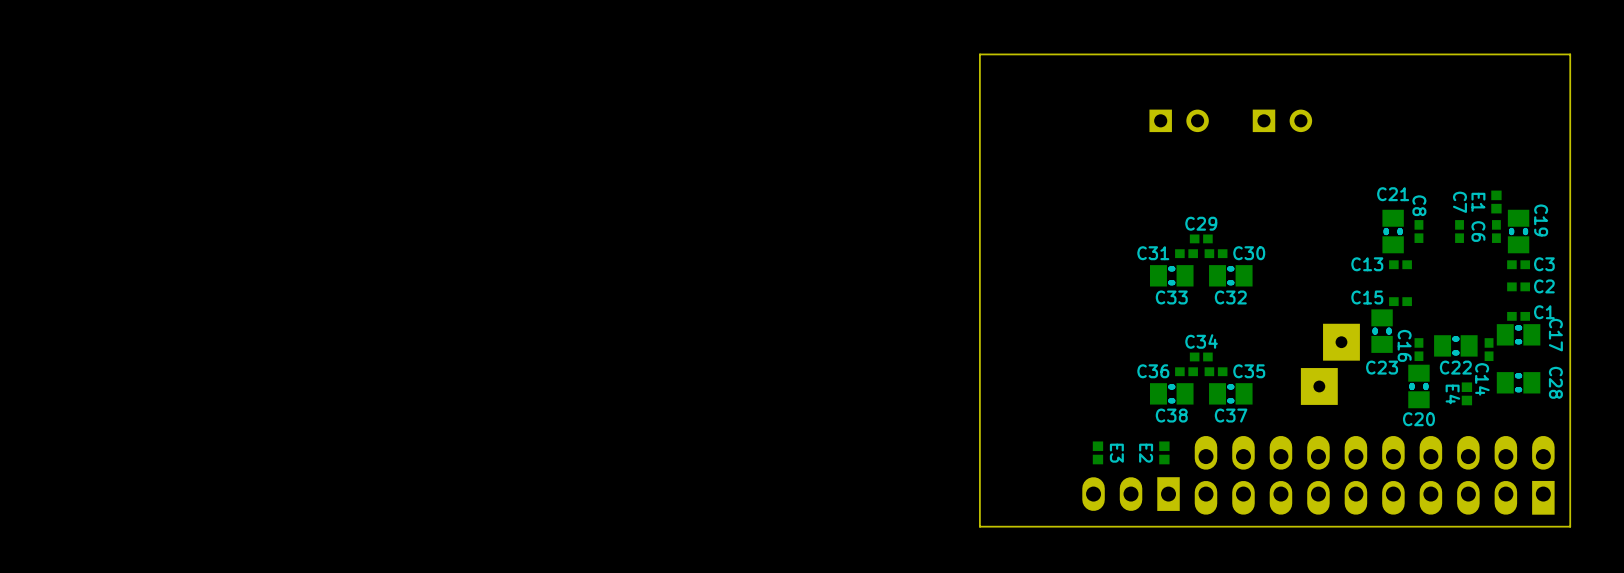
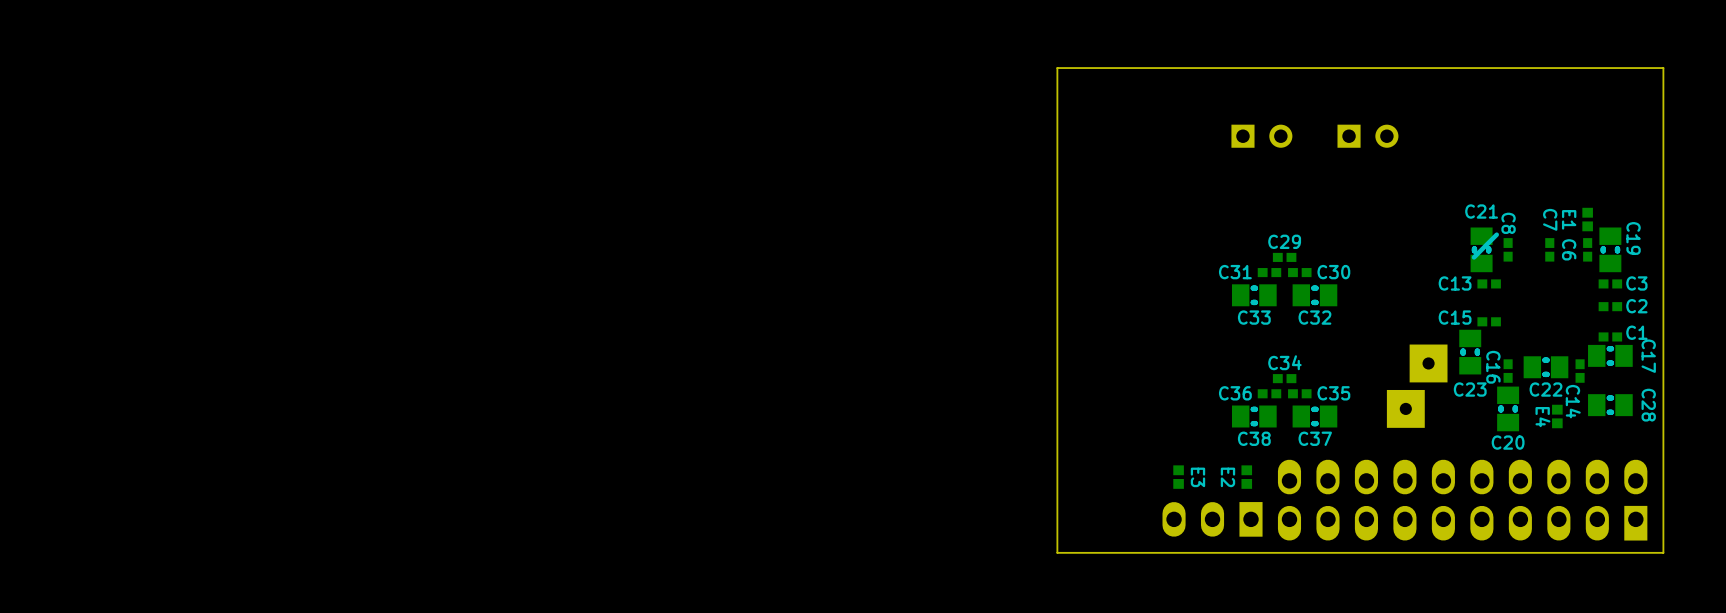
part: none -> (1485, 246)

